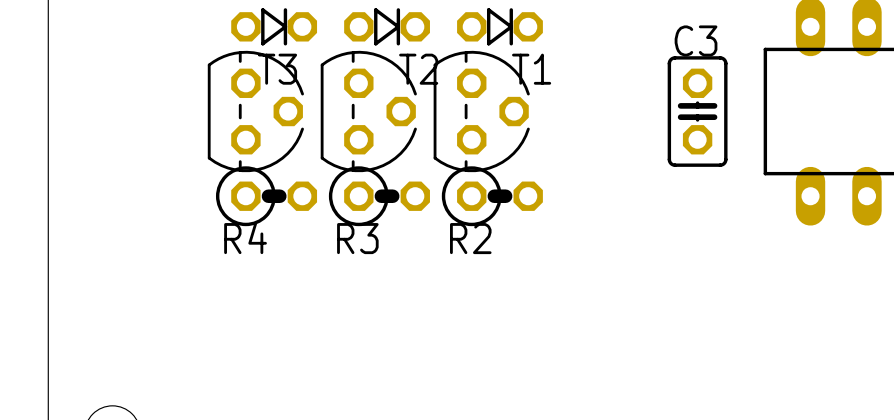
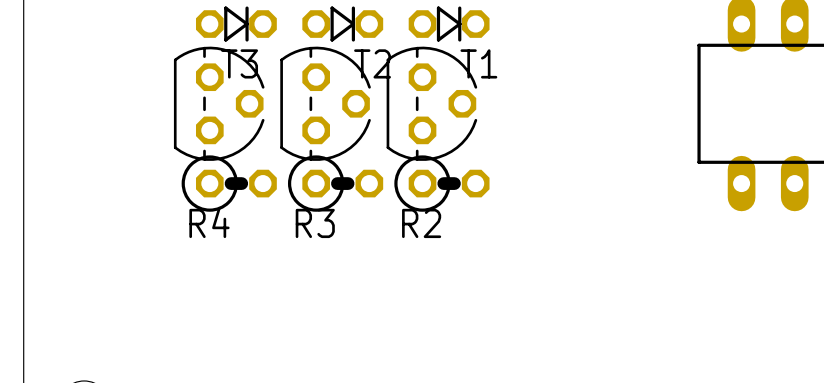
C3: (697, 111) -> none

